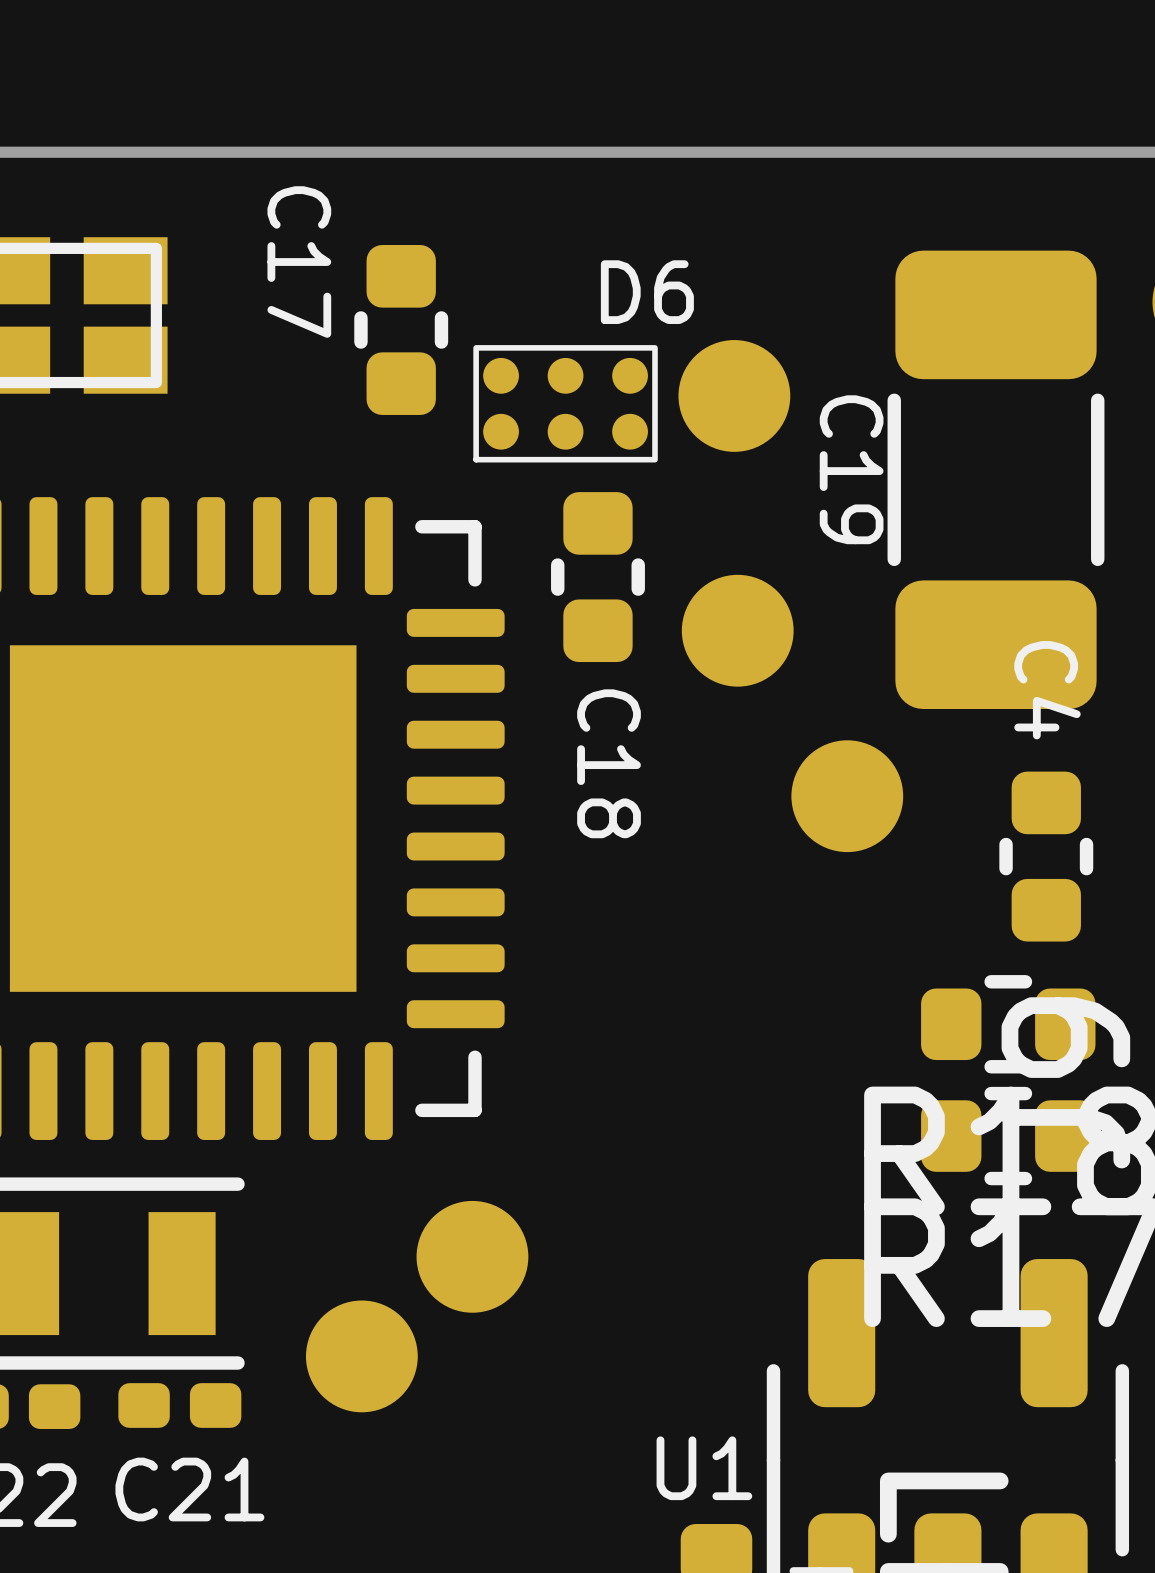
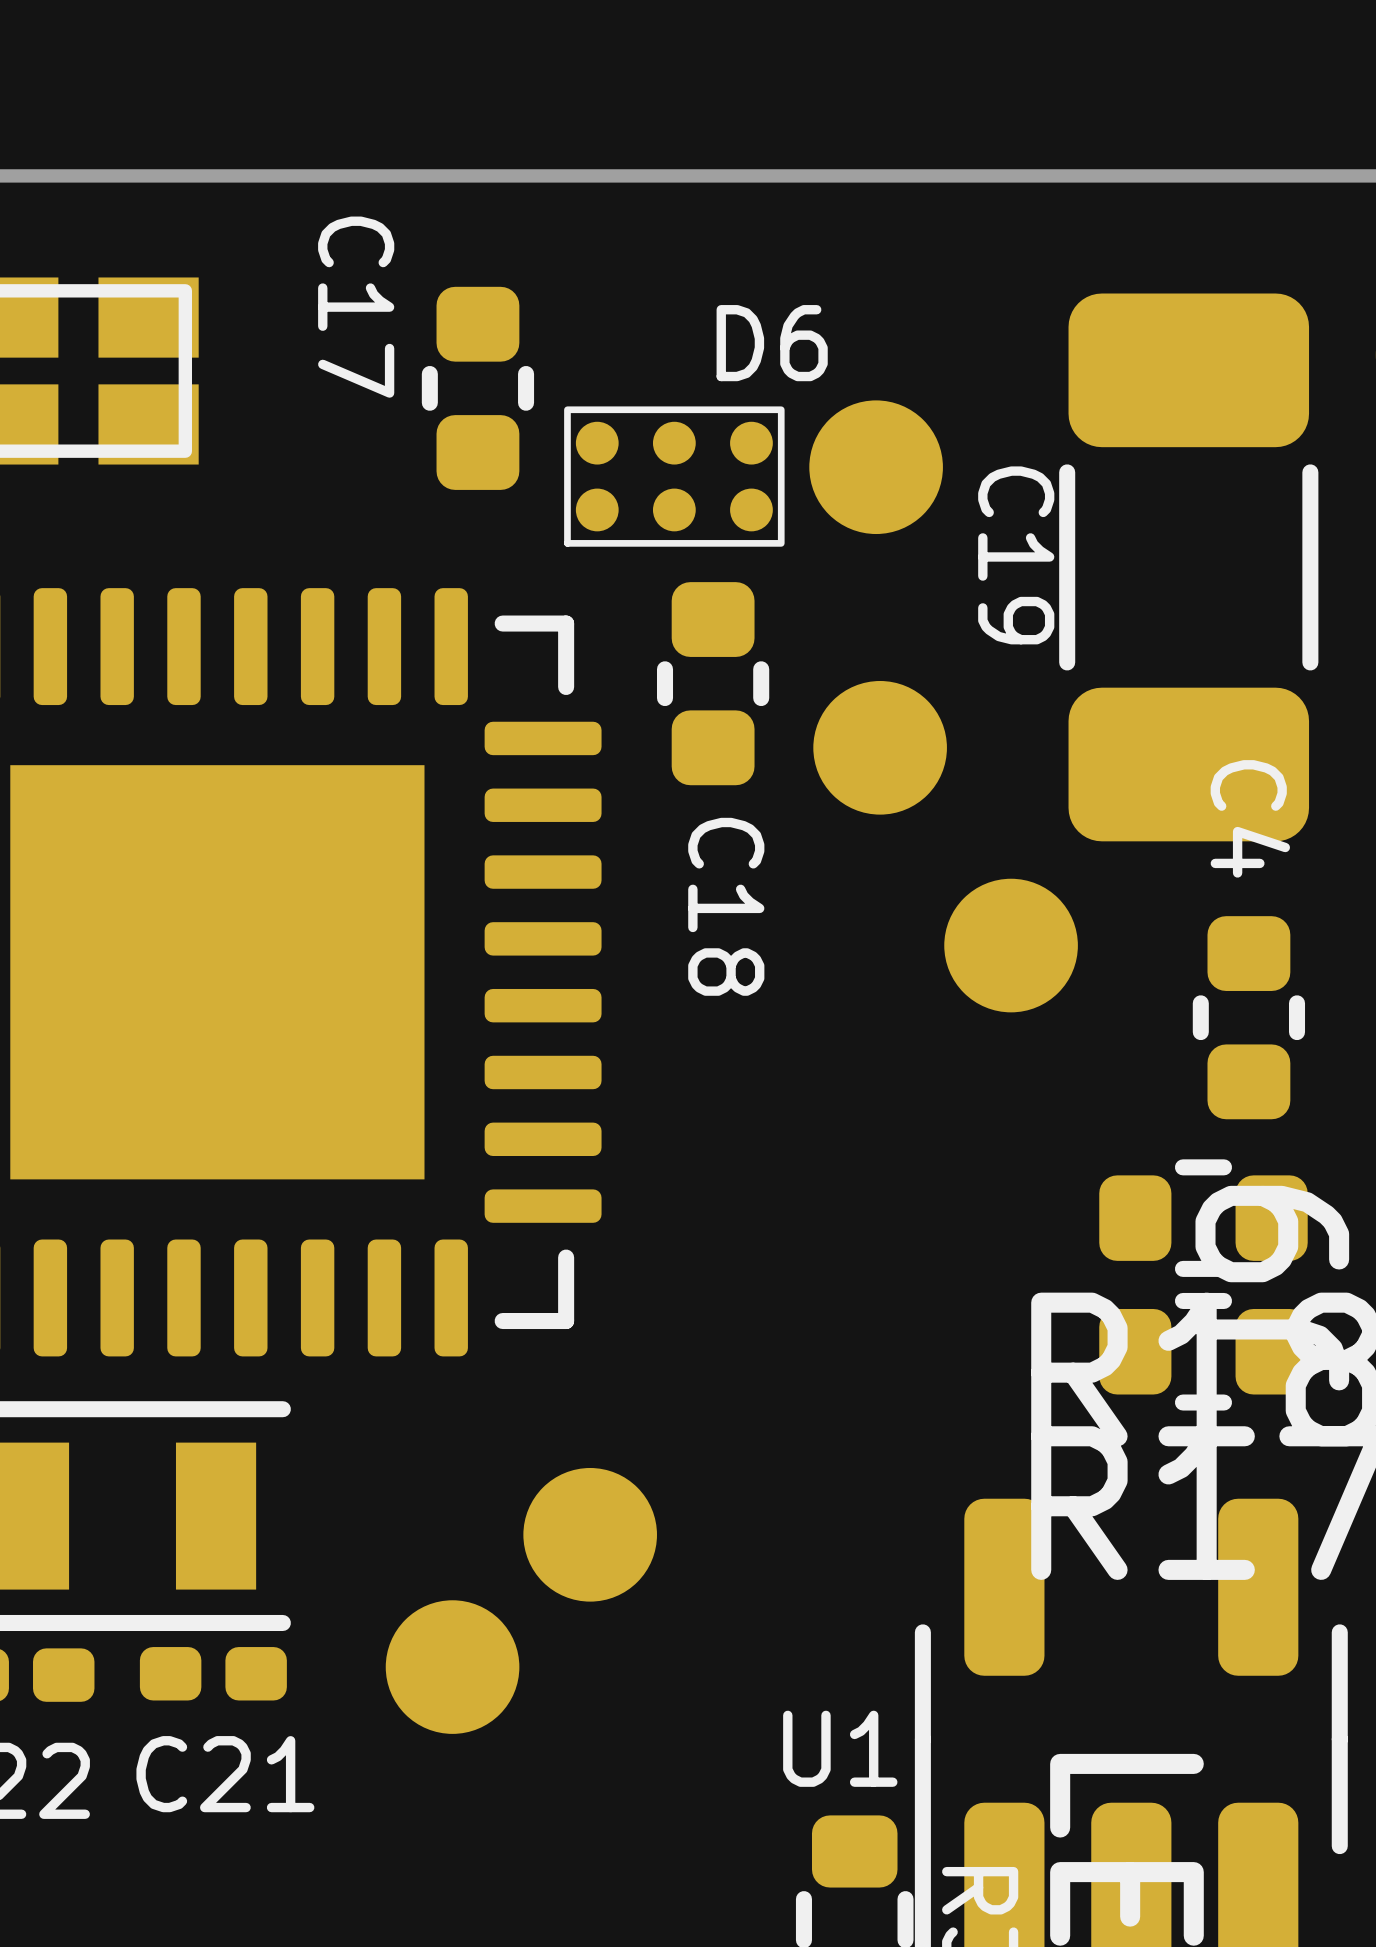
part position: (472, 1256) -> (590, 1534)
part position: (361, 1356) -> (452, 1667)

